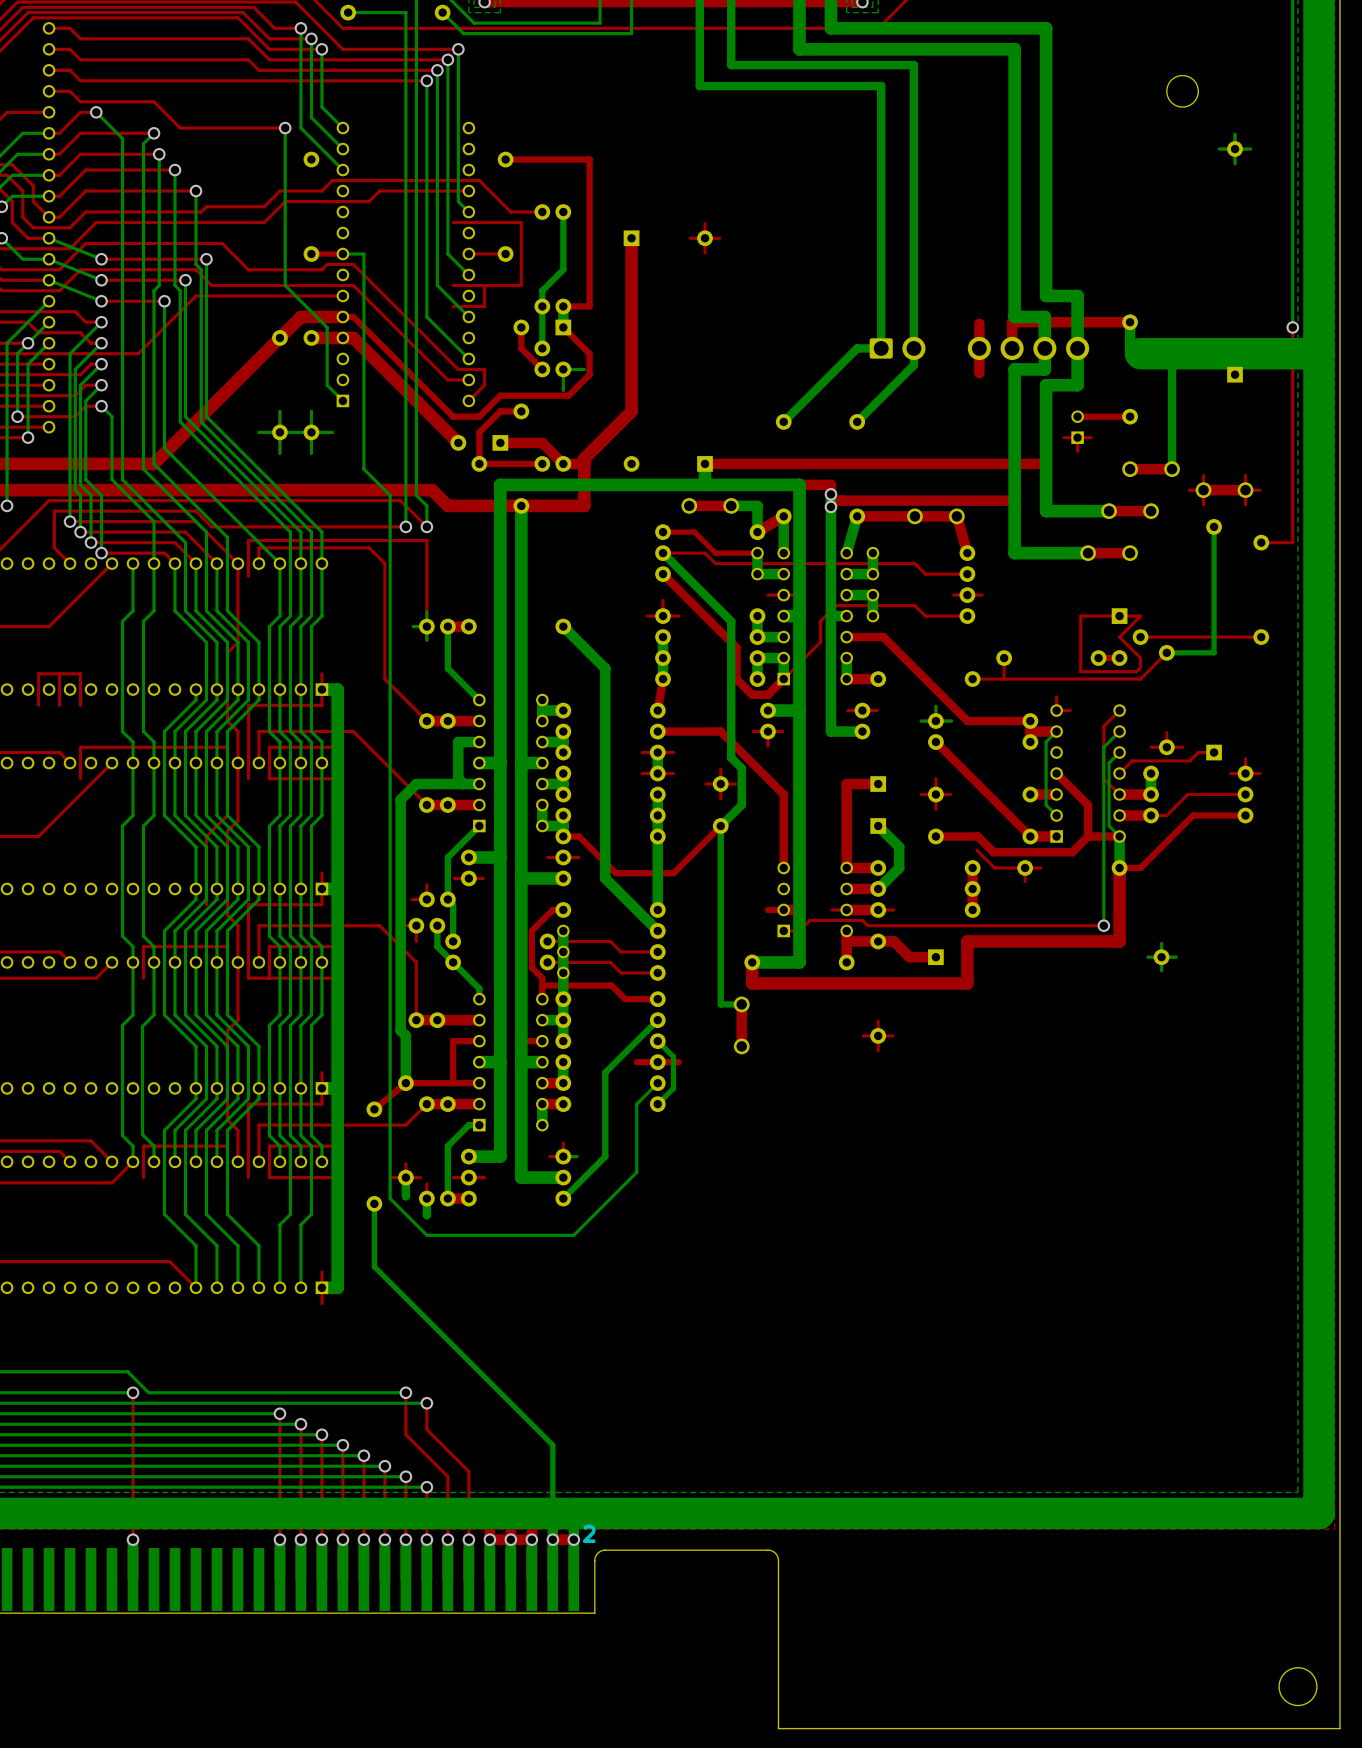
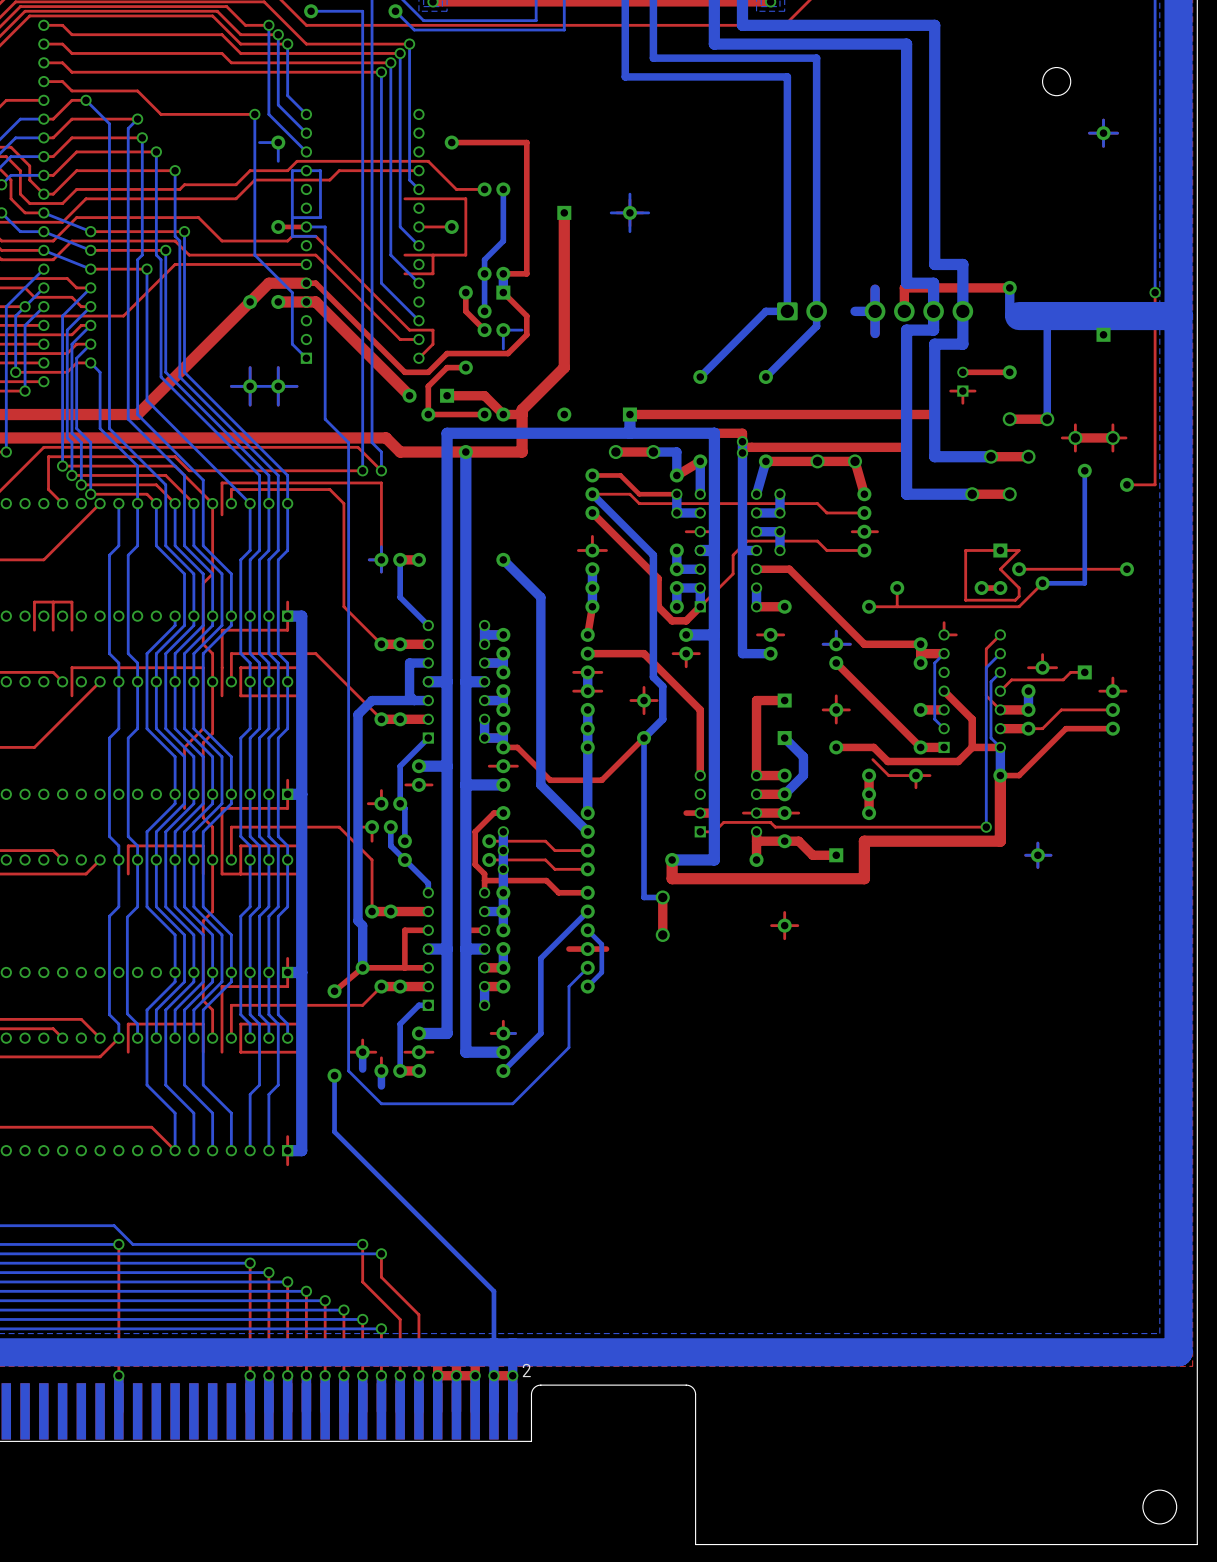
bottom track: none -> (259, 142) (278, 142) (278, 161)
bottom track: none -> (629, 194) (629, 231)
bottom track: none -> (648, 212) (611, 212)
bottom track: none -> (292, 217) (320, 217) (320, 170) (292, 170) (292, 236) (315, 236)
bottom track: none -> (875, 289) (875, 333)
bottom track: none -> (875, 311) (855, 311)

